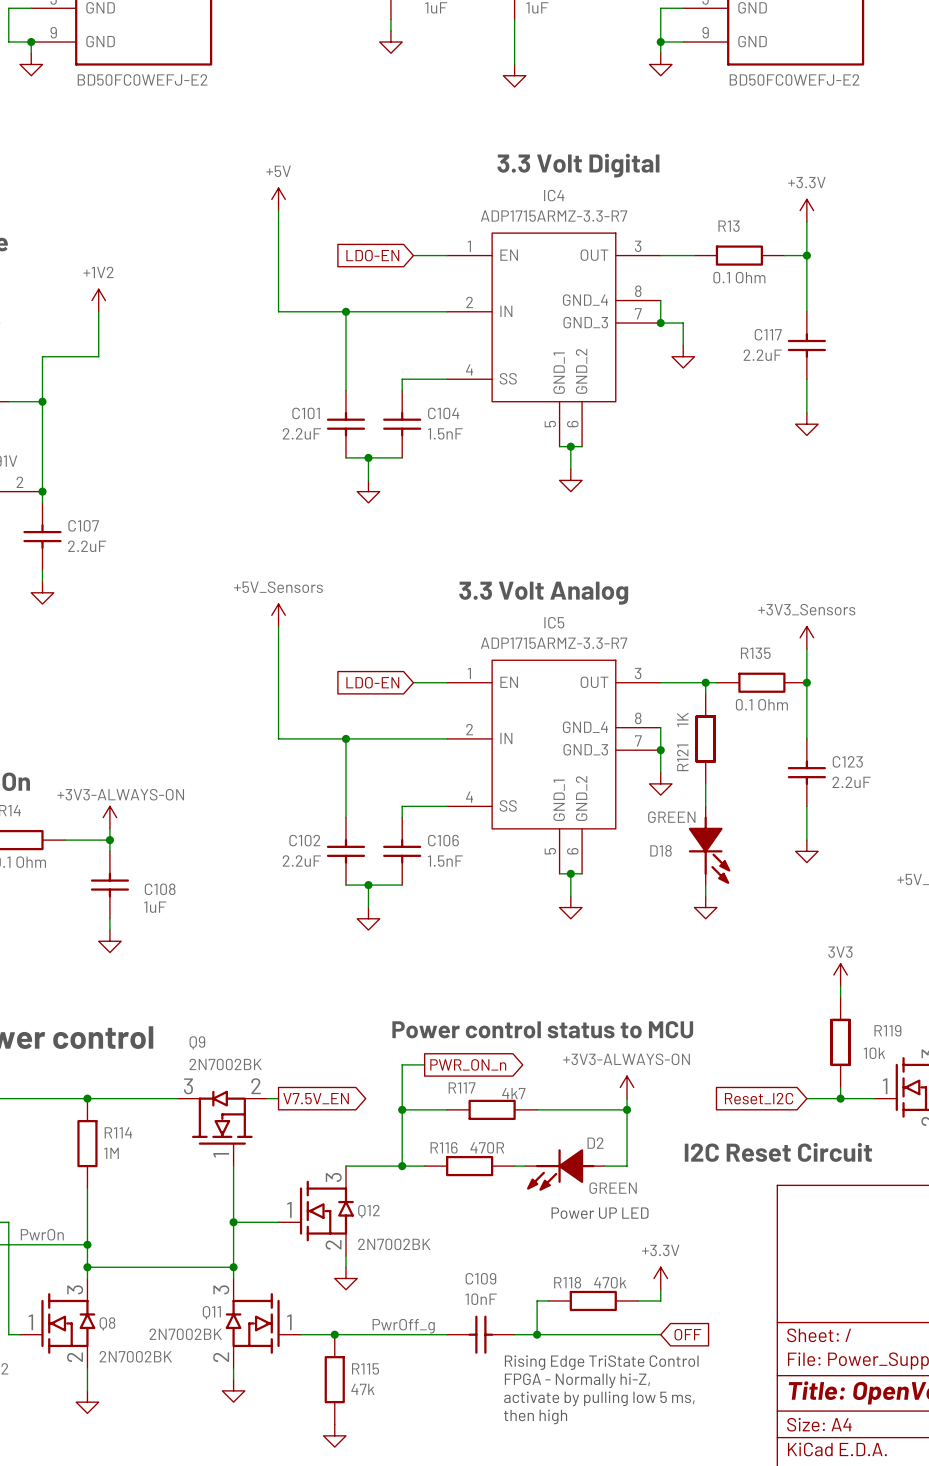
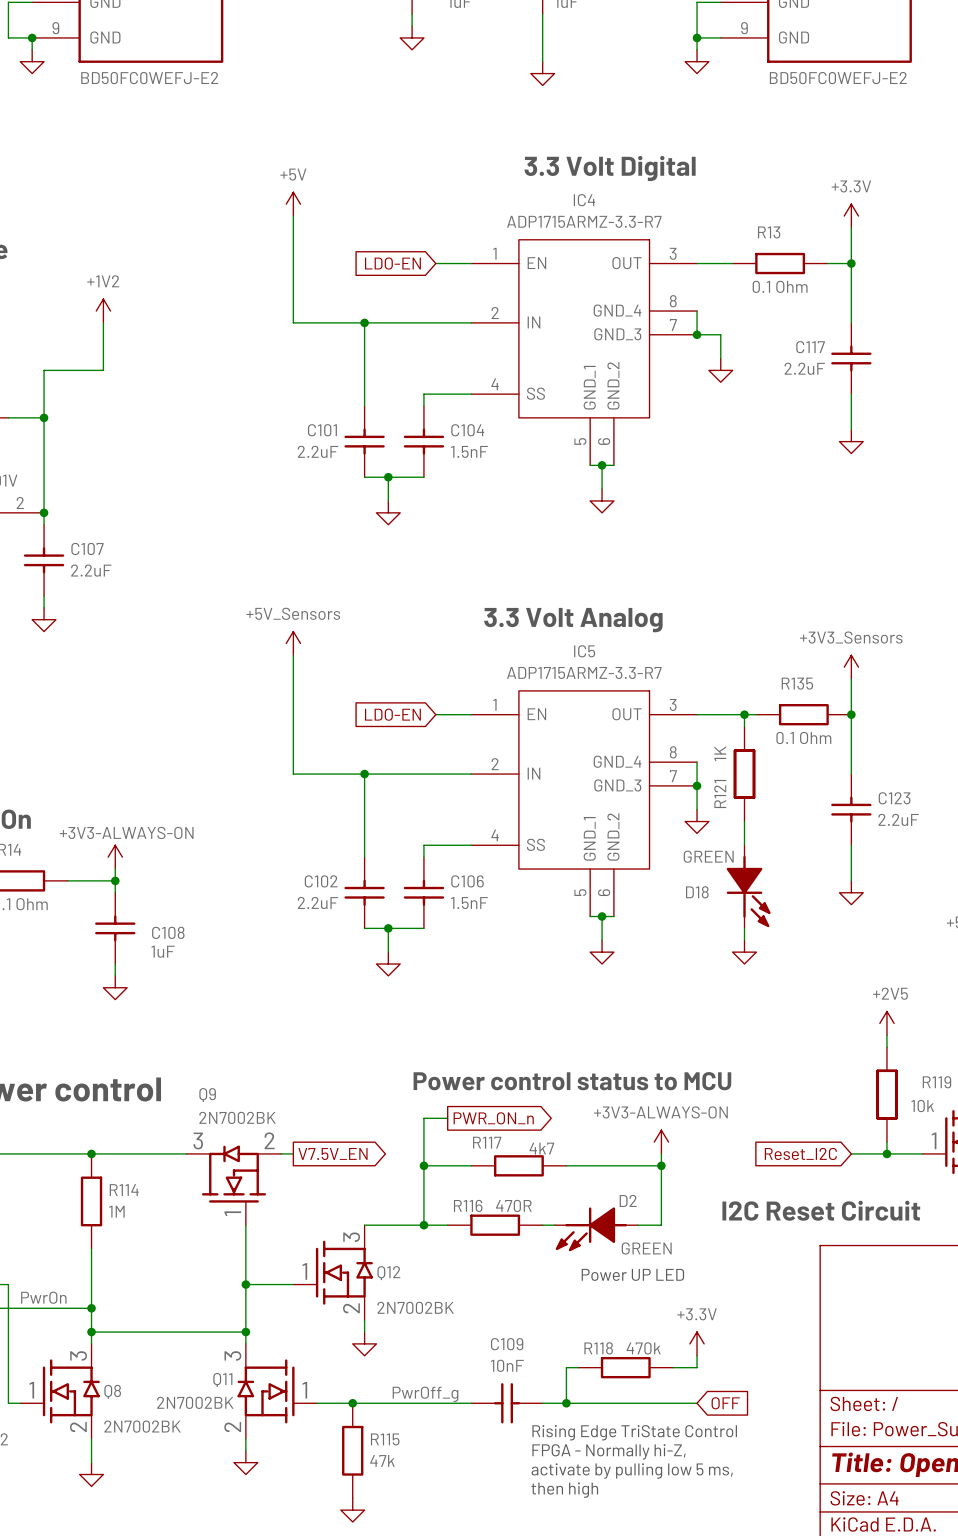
power symbol: 3V3 (840, 974) -> +2V5 (886, 1023)

